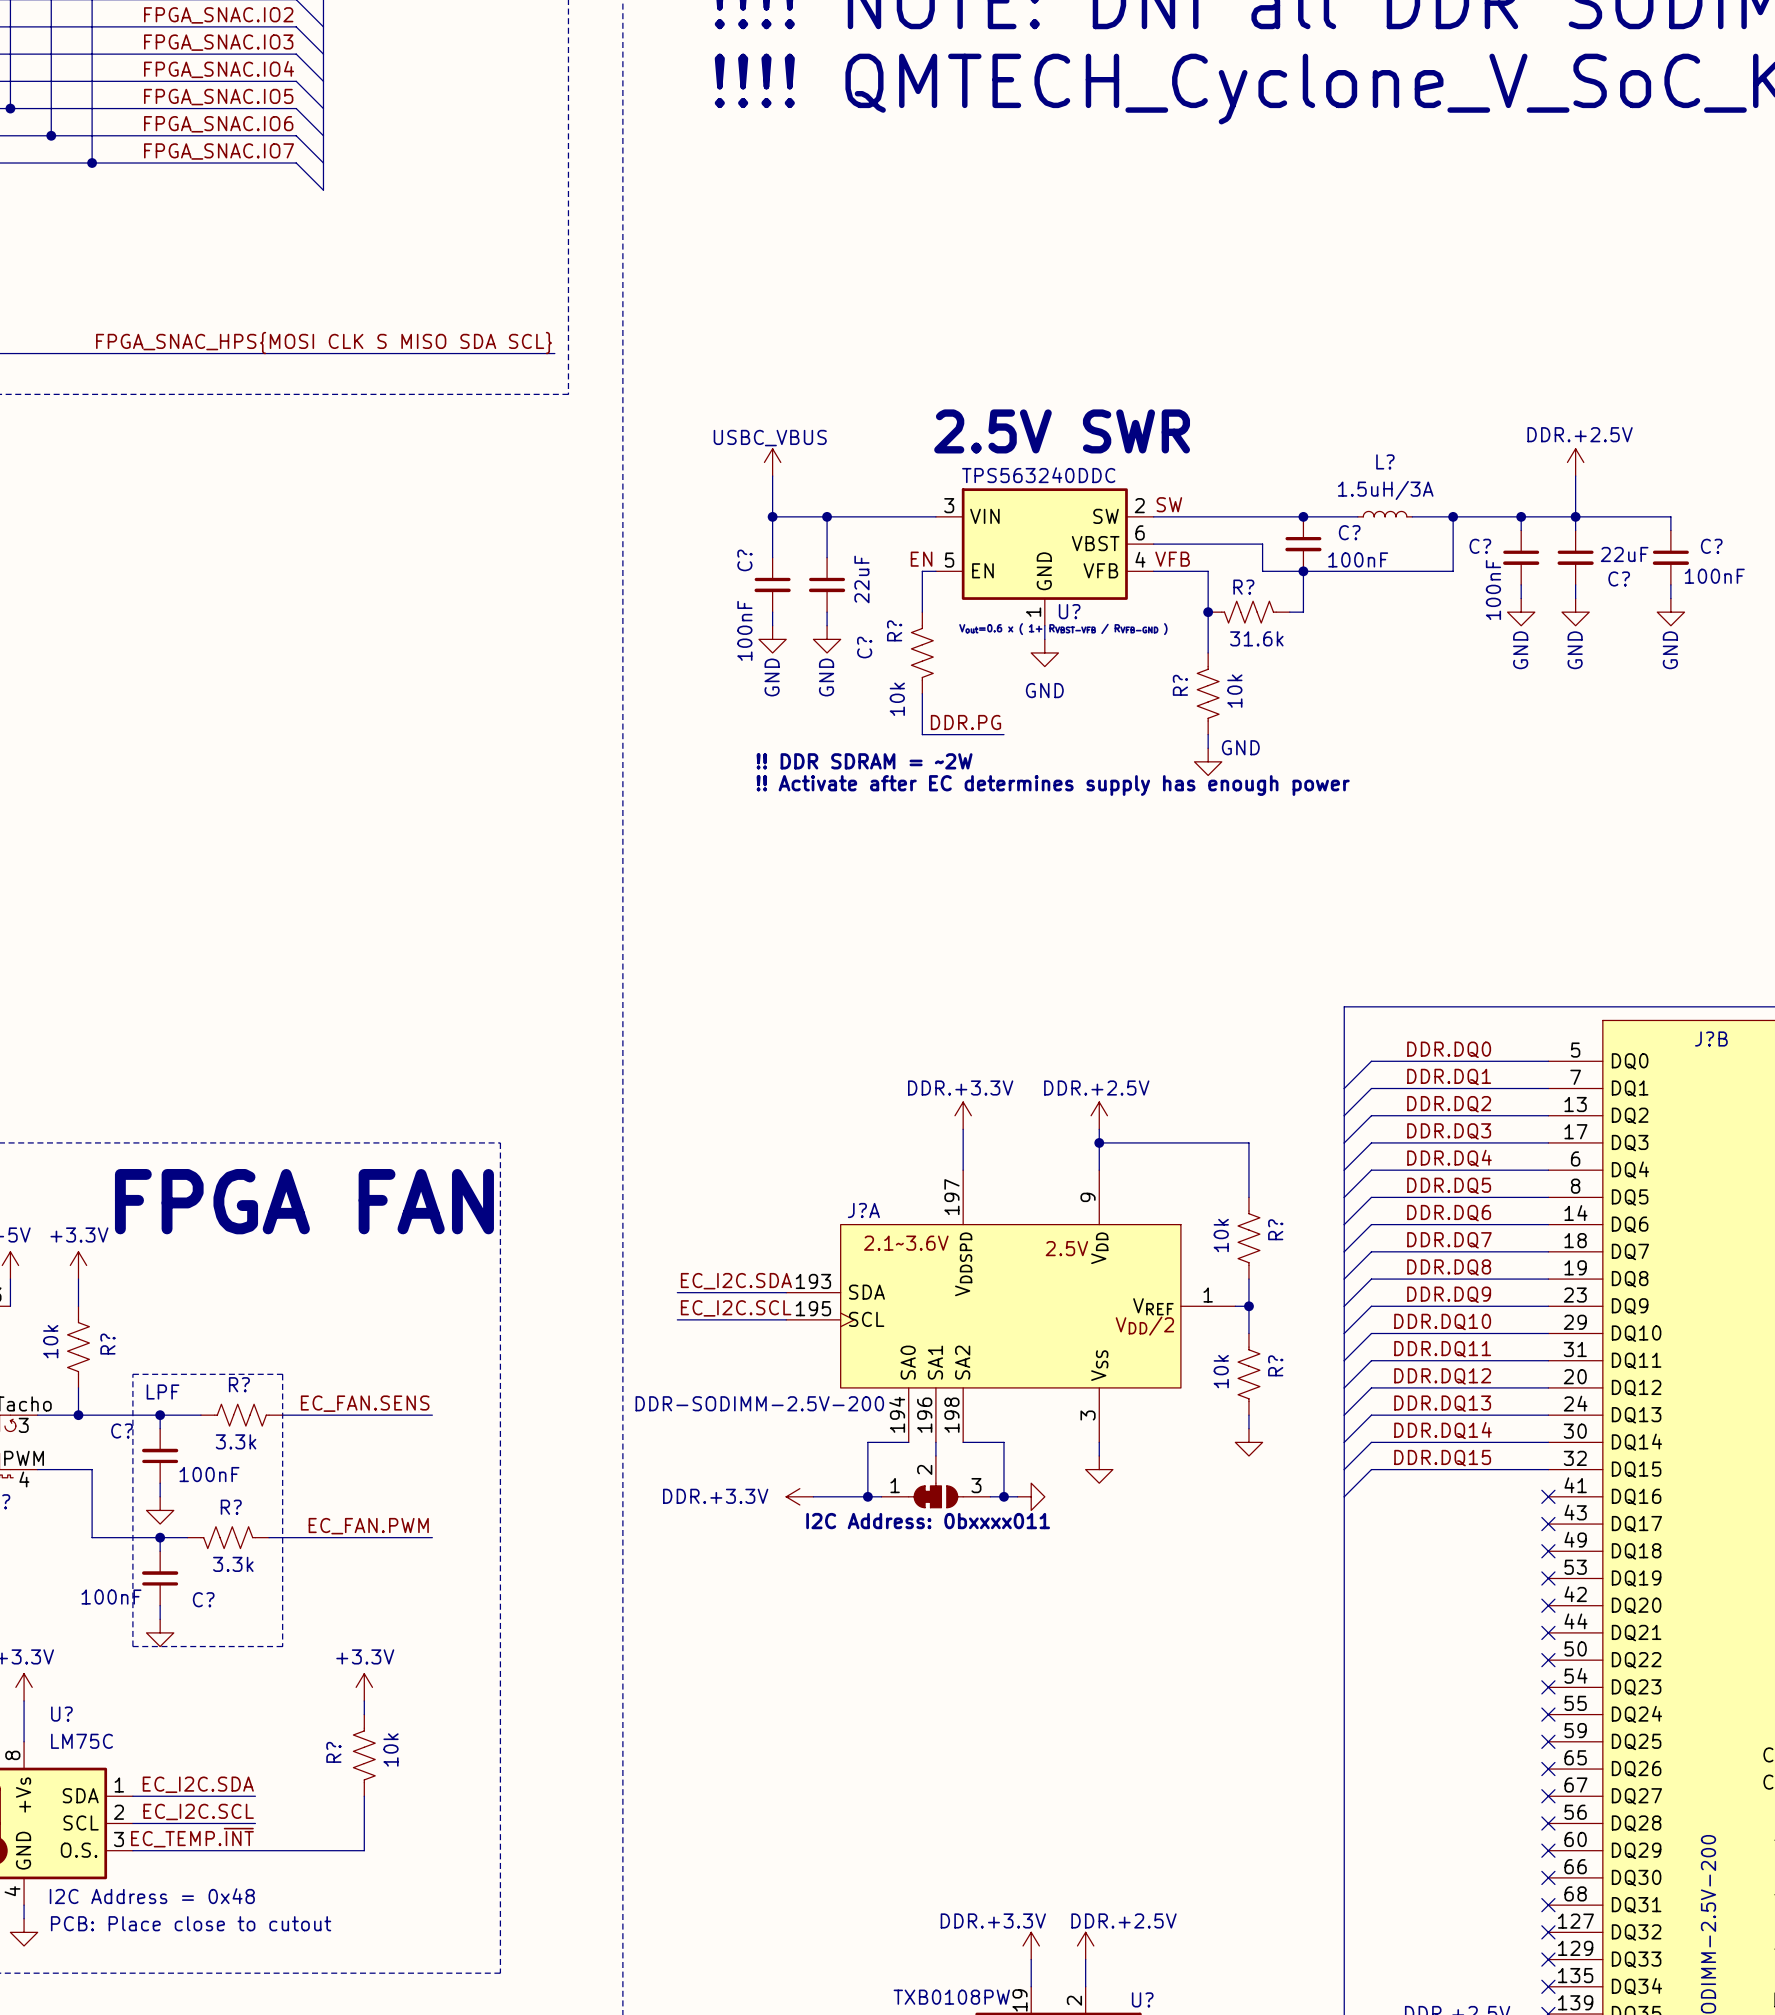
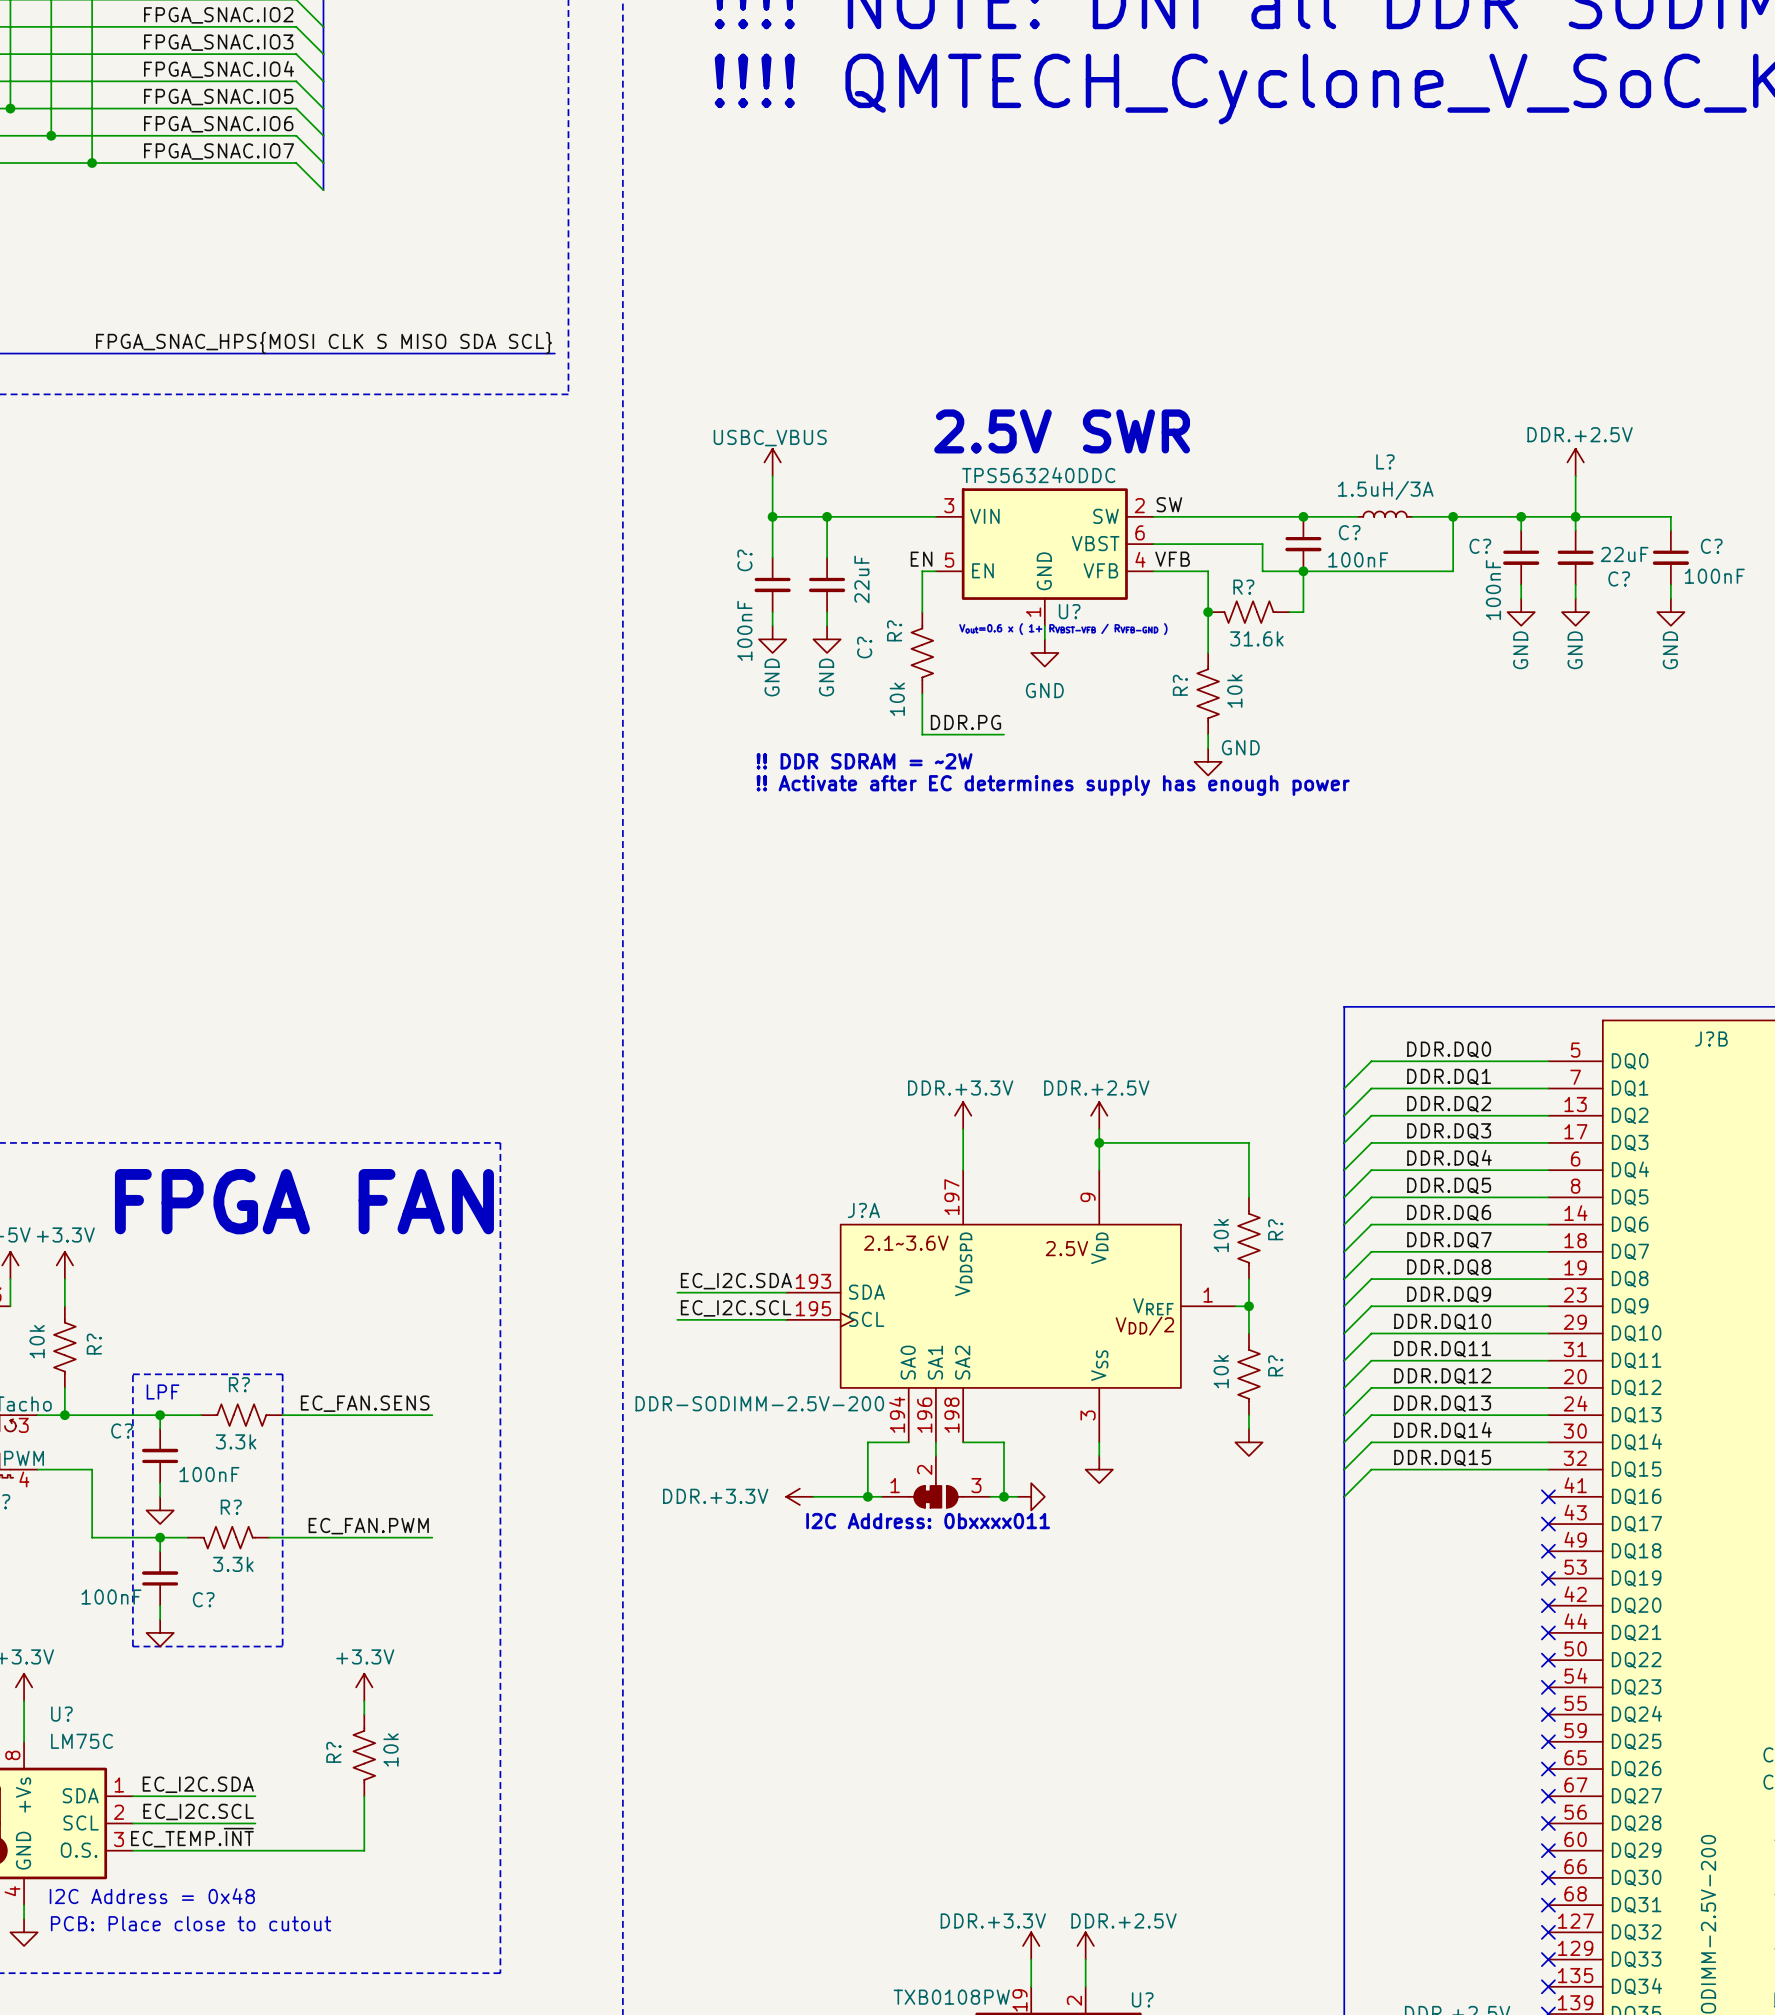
power symbol position: +3.3V (78, 1265) -> +3.3V (64, 1265)
wire: (78, 1279) (78, 1306) -> (64, 1279) (64, 1306)
R? position: (78, 1347) -> (64, 1347)
wire: (78, 1387) (78, 1415) -> (64, 1387) (64, 1415)
junction position: (78, 1415) -> (64, 1415)

